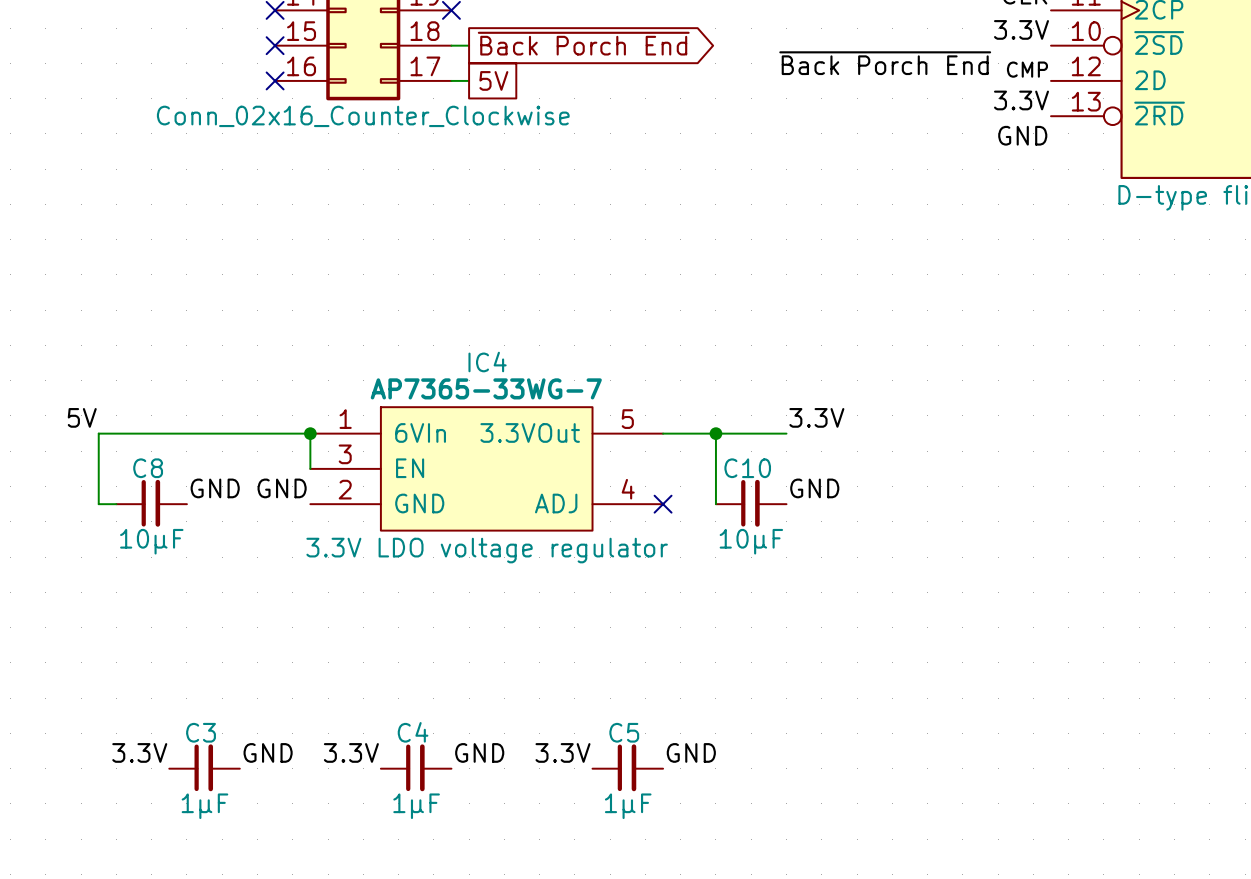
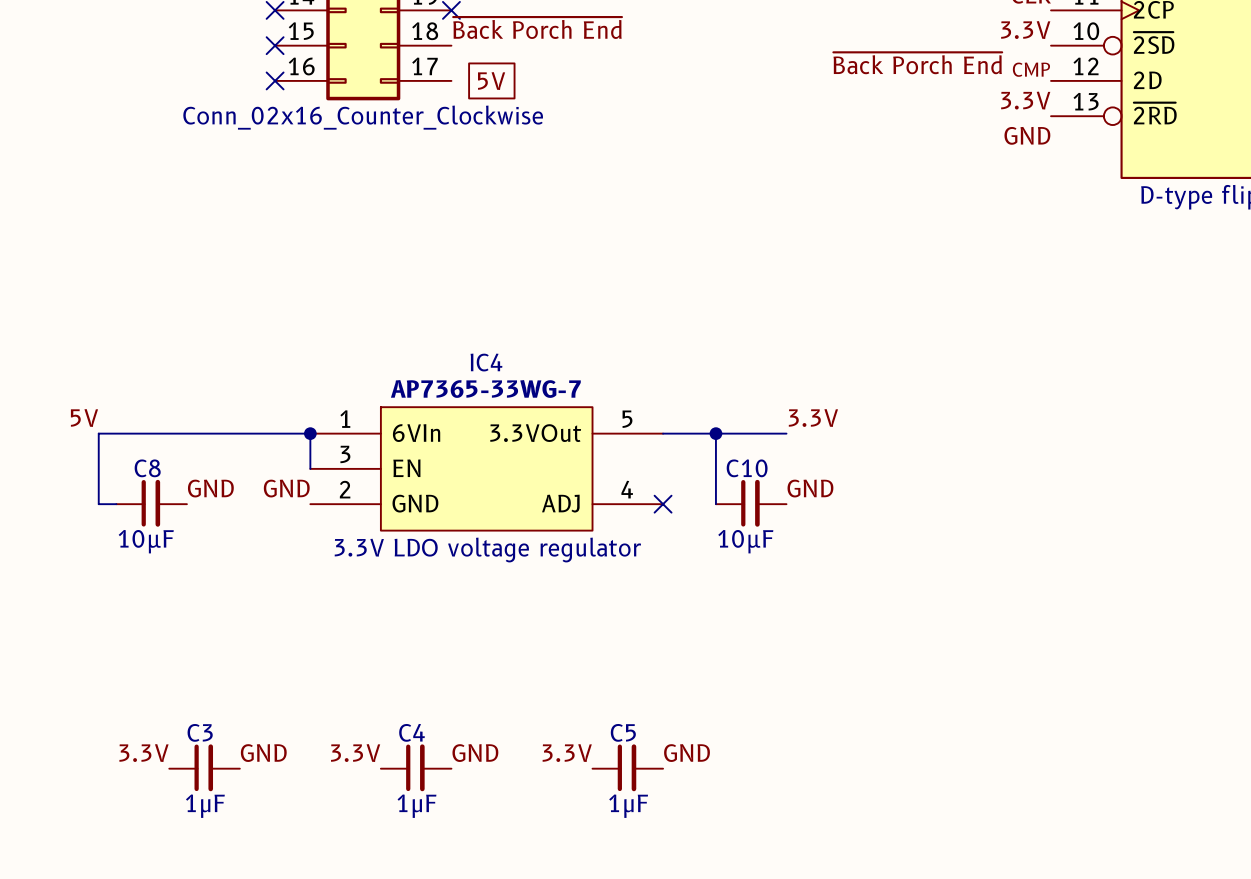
label: none -> ~{Back Porch End} (537, 28)
global label: ~{Back Porch End} (583, 43) -> none
wire: (451, 45) (469, 45) -> none
wire: (451, 80) (469, 80) -> none

